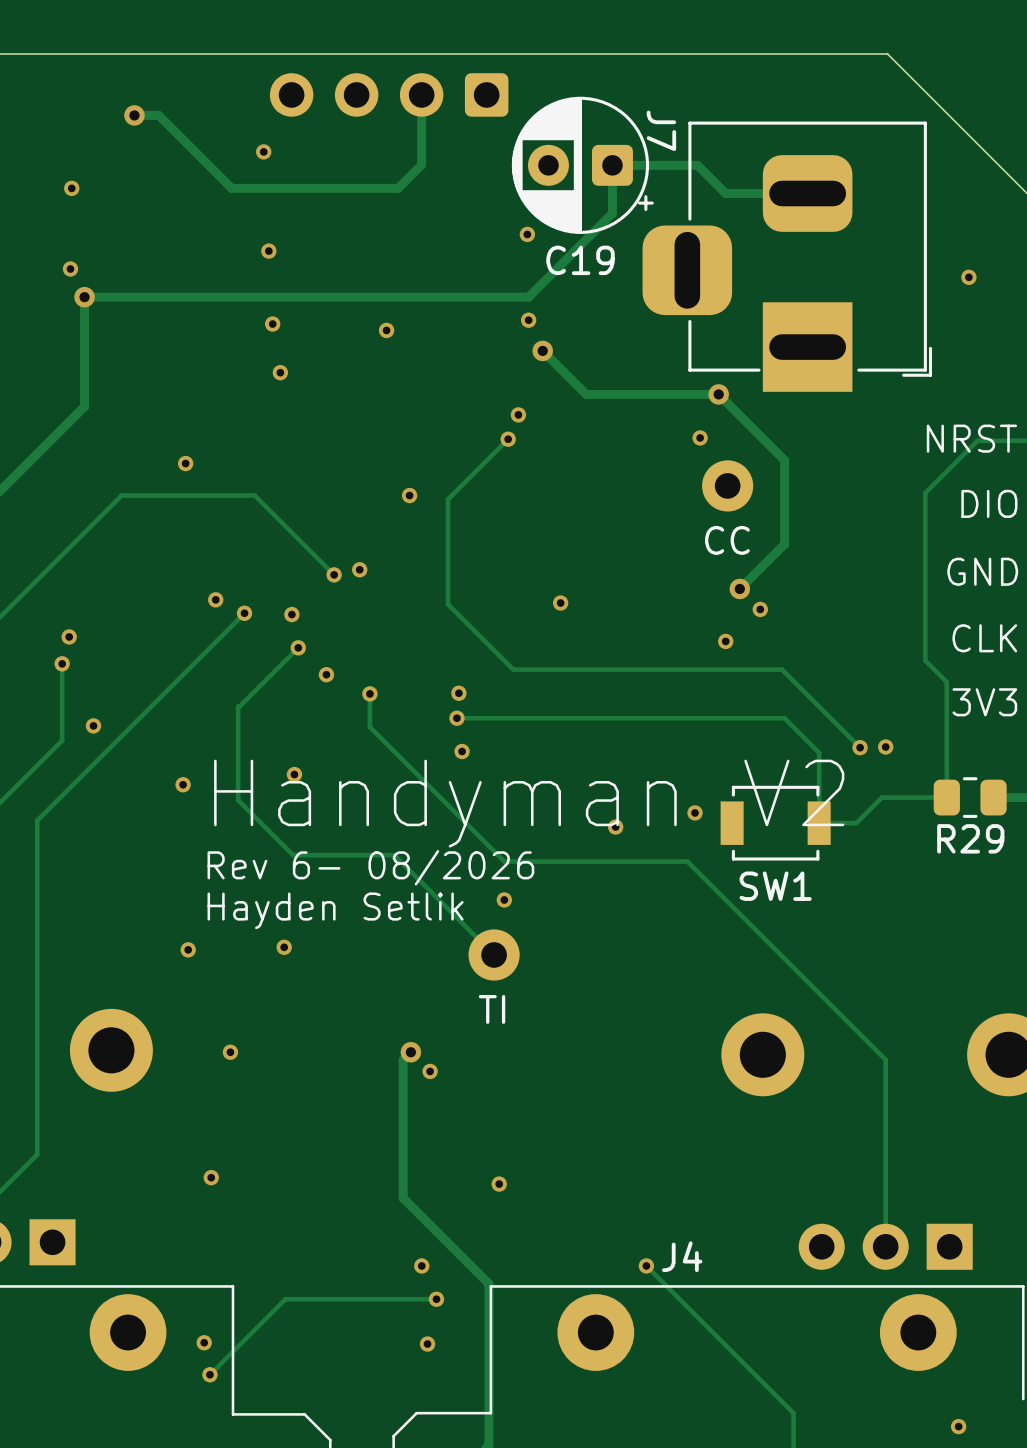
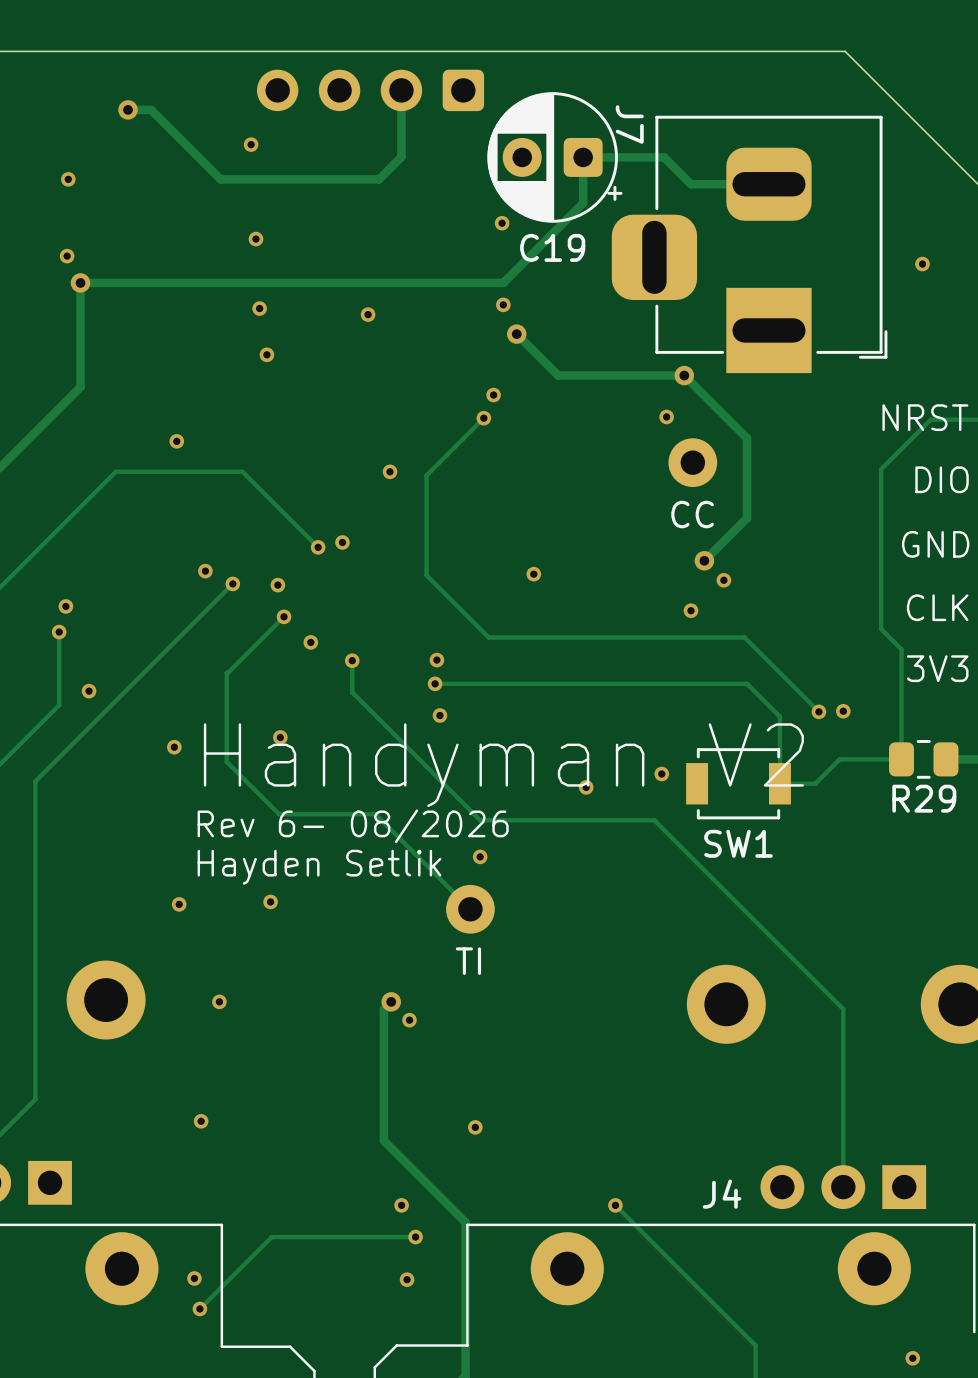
J4 name position: J4 (682, 1256) -> J4 (722, 1194)

